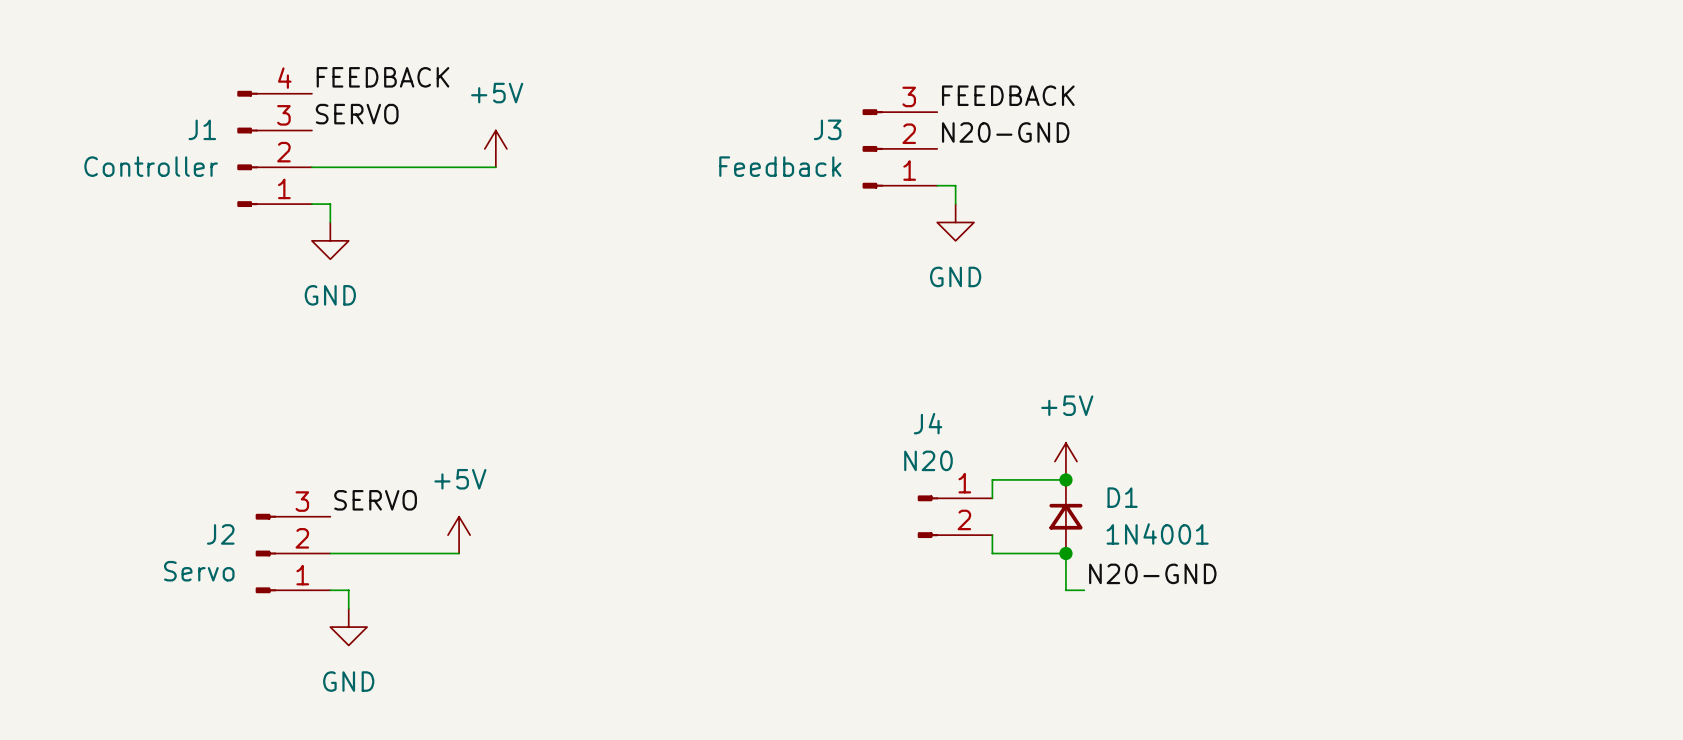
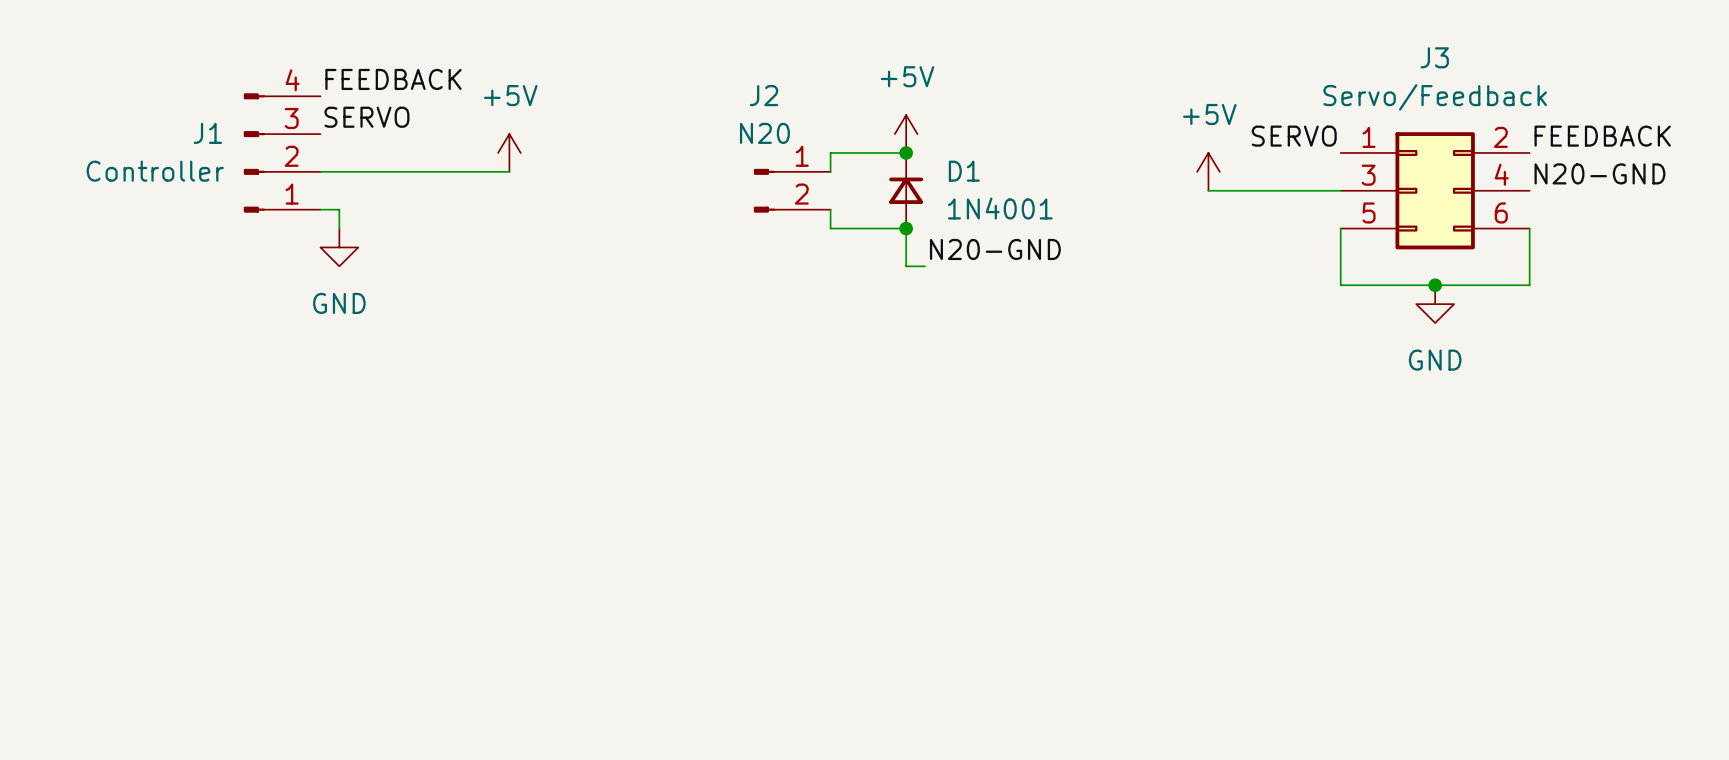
label: FEEDBACK (1008, 95) -> none
J3 symbol: [862, 109, 938, 189] -> [1340, 132, 1530, 250]
J3 name position: J3 (827, 129) -> J3 (1434, 57)
power symbol: none -> +5V (906, 134)
label position: N20-GND (1005, 132) -> N20-GND (995, 249)
label: none -> SERVO (1294, 136)
label: none -> FEEDBACK (1602, 136)
wire: none -> (906, 152) (830, 152) (830, 171)
junction: none -> (906, 152)
J3 value: Feedback (780, 166) -> Servo/Feedback (1435, 97)
power symbol: none -> +5V (1208, 171)
label: none -> N20-GND (1599, 173)
wire: (937, 185) (955, 185) (955, 204) -> none
wire: none -> (1208, 190) (1340, 190)
wire: none -> (830, 209) (830, 228) (906, 228) (906, 266) (925, 266)
junction: none -> (906, 228)
power symbol: GND (955, 222) -> none
wire: none -> (1340, 228) (1340, 285) (1529, 285) (1529, 228)
junction: none -> (1435, 285)
power symbol: none -> GND (1435, 304)
power symbol: +5V (1065, 461) -> none
wire: (1065, 479) (992, 479) (992, 498) -> none
junction: (1065, 479) -> none
label: SERVO (375, 500) -> none
J2 symbol: [255, 513, 331, 594] -> [753, 168, 831, 213]
J4: N20 (955, 516) -> none
D1 position: (1065, 516) -> (906, 190)
J2 name position: J2 (220, 534) -> J2 (764, 95)
power symbol: +5V (459, 535) -> none
wire: (992, 535) (992, 553) (1065, 553) (1065, 590) (1084, 590) -> none
wire: (330, 553) (459, 553) -> none
junction: (1065, 553) -> none
J2 value: Servo (199, 571) -> N20 (764, 133)
label: N20-GND (1152, 573) -> none
wire: (330, 590) (348, 590) (348, 608) -> none
power symbol: GND (348, 627) -> none

